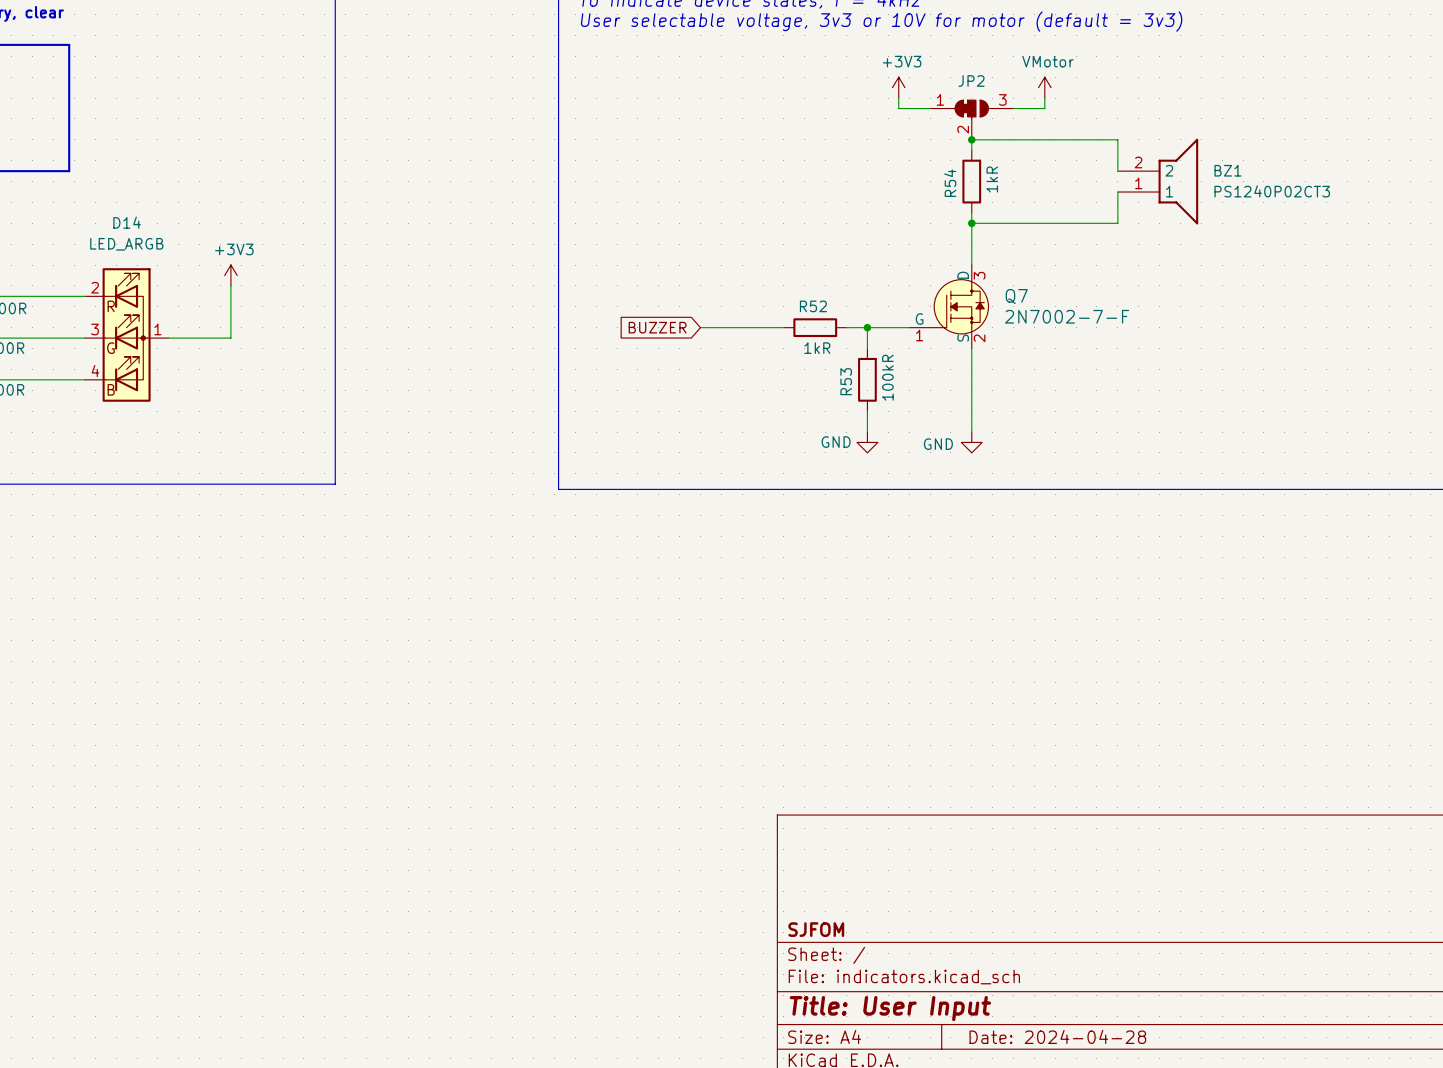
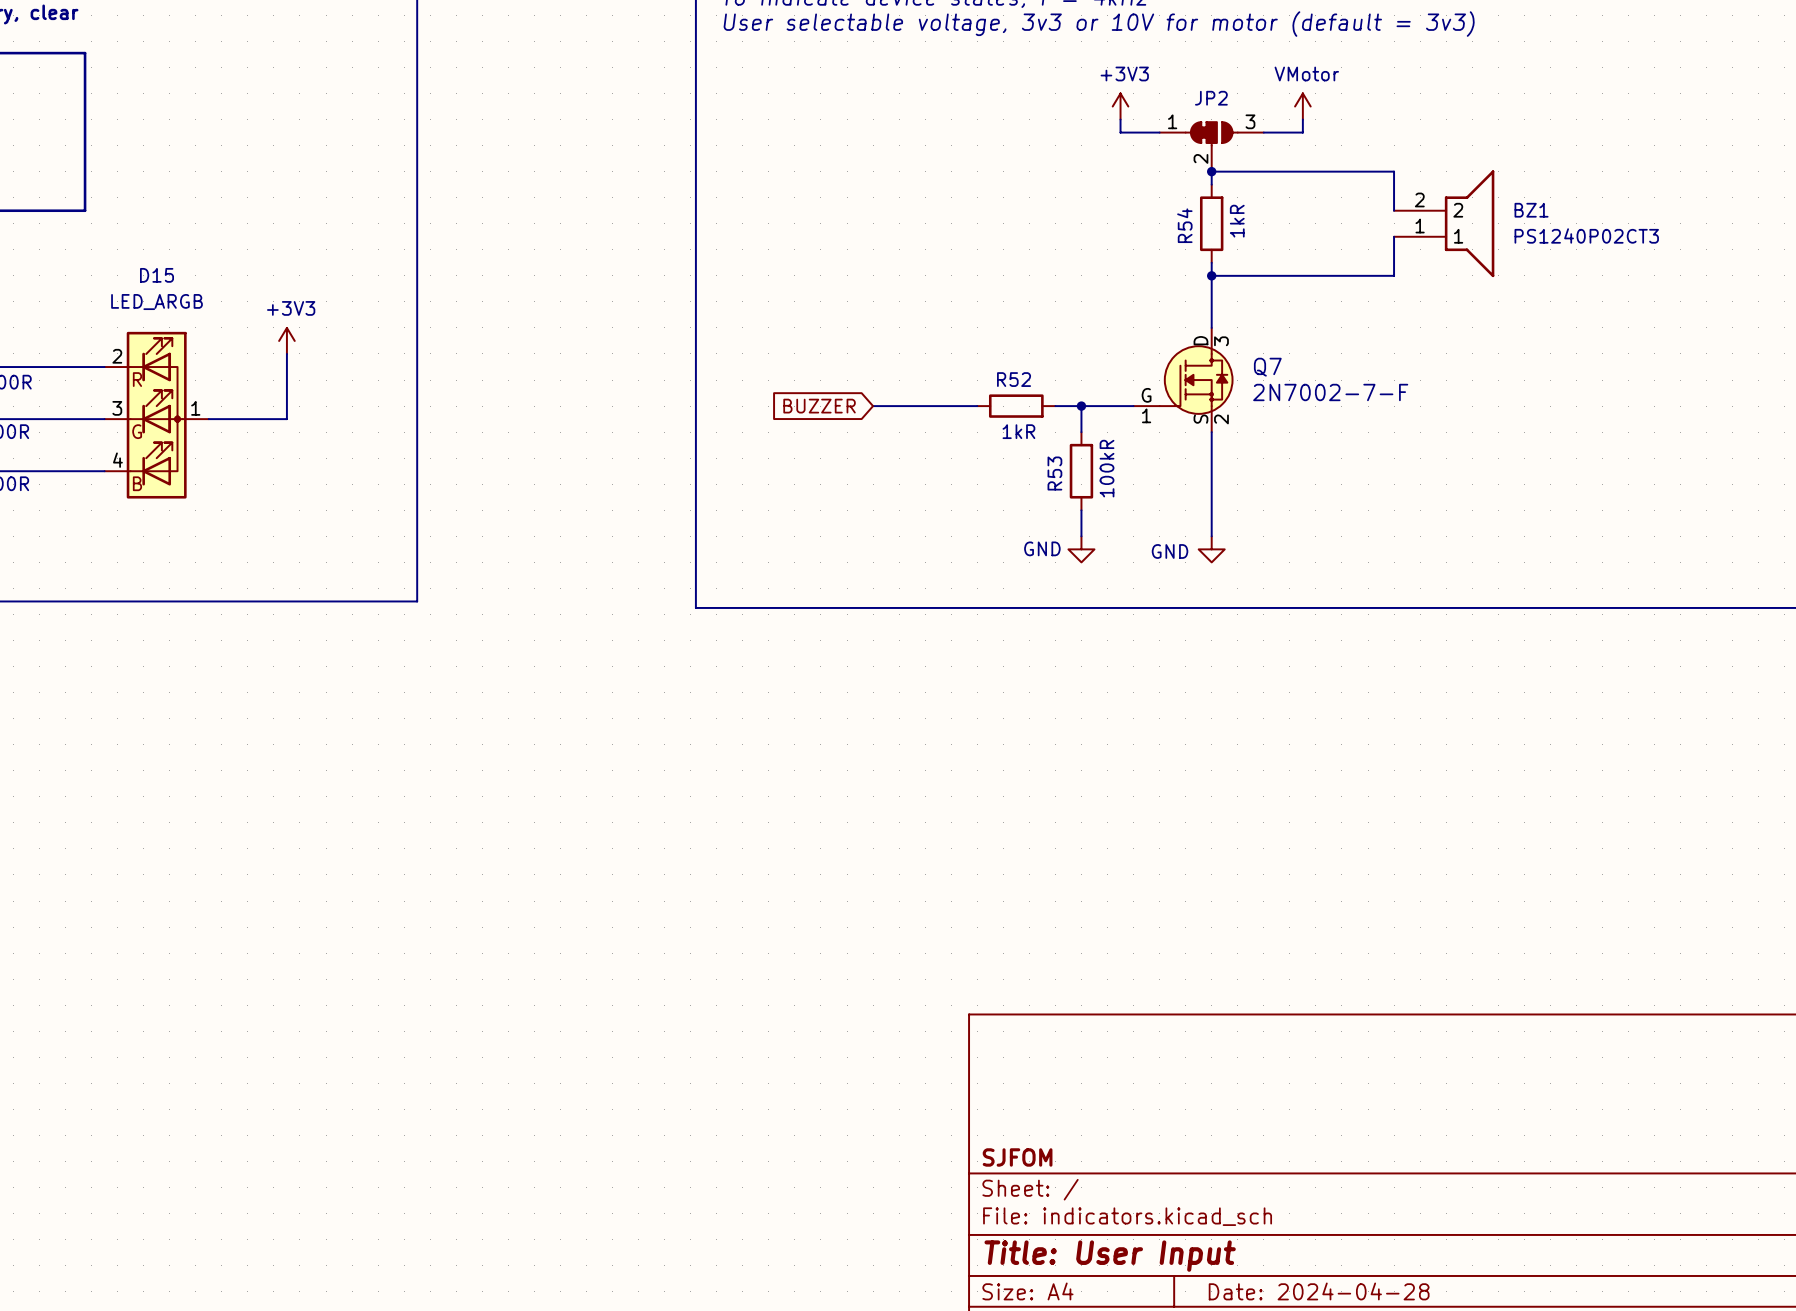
D14 name: D14 (127, 222) -> D15 (156, 275)

